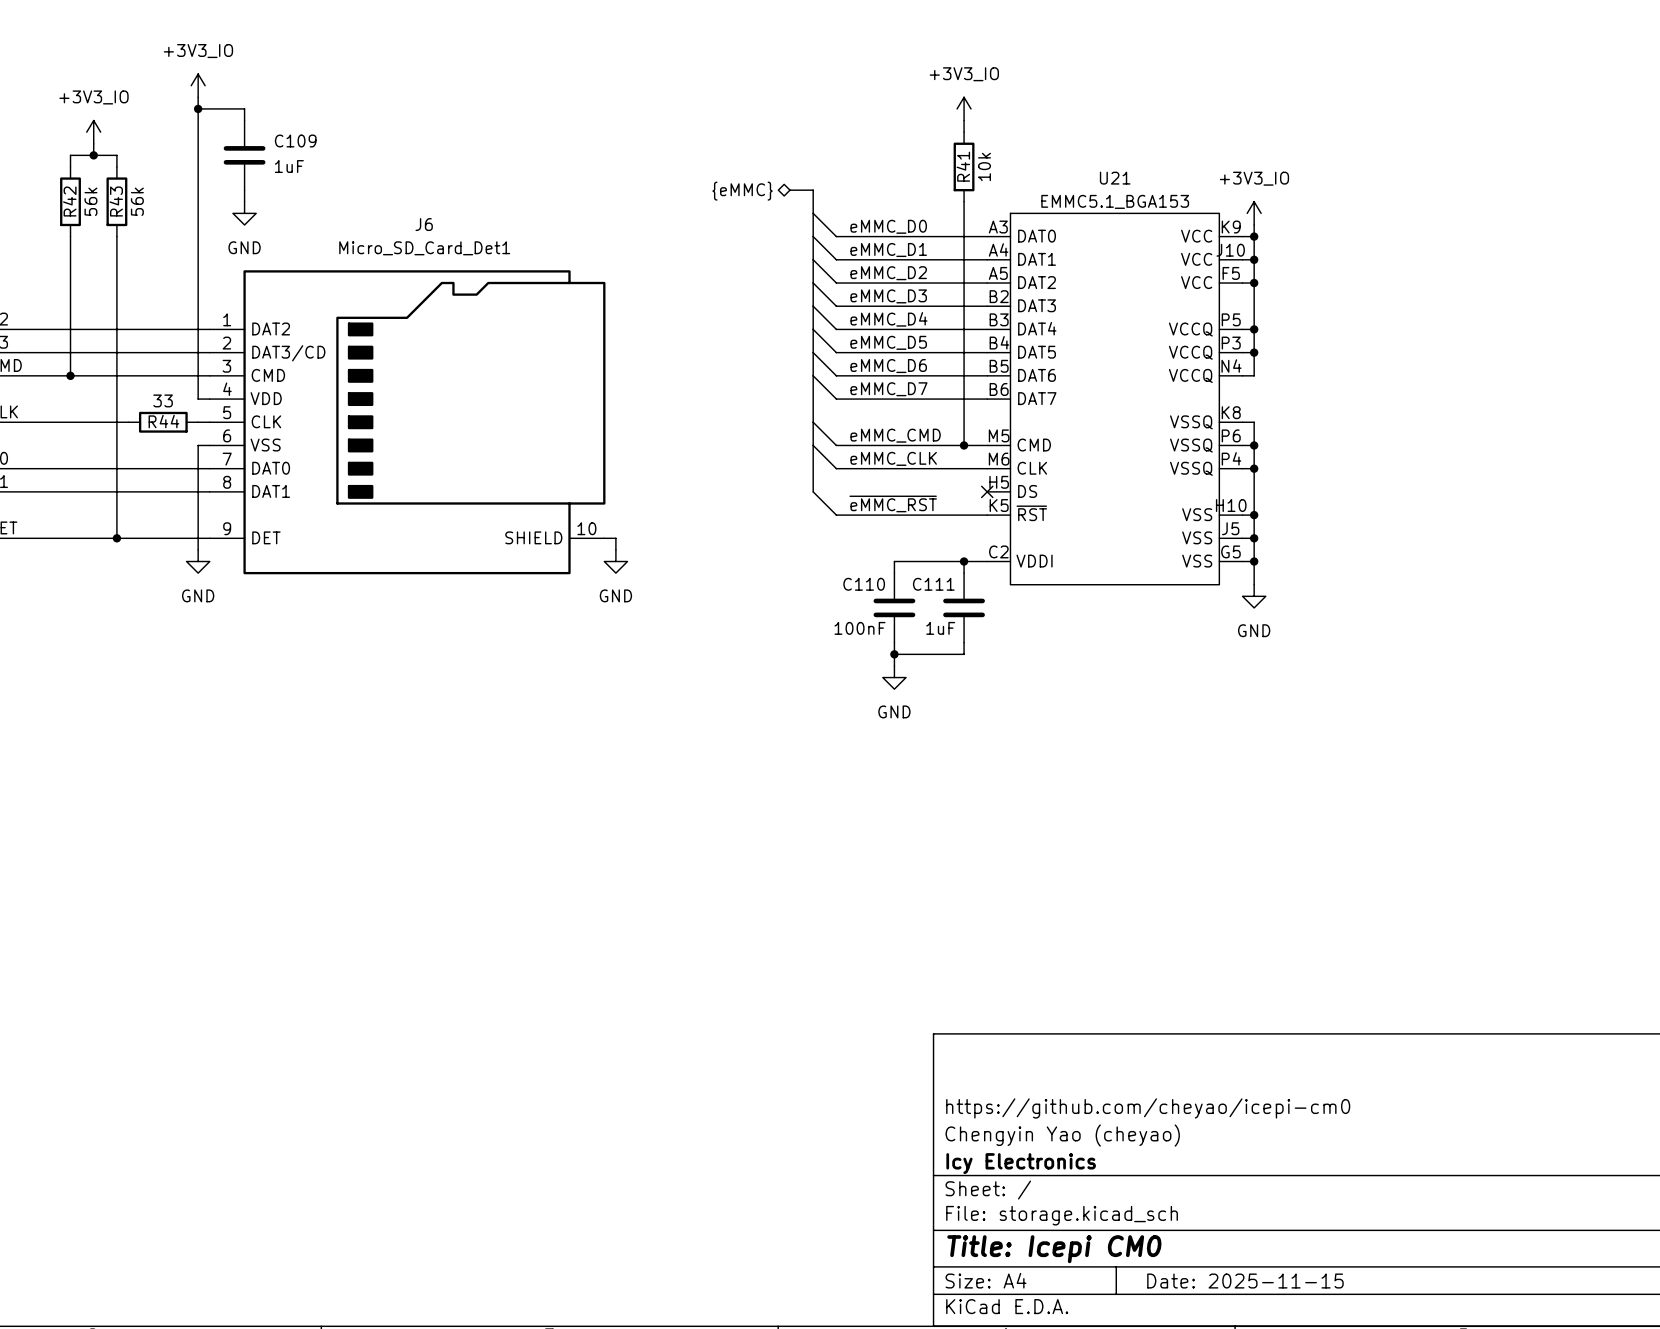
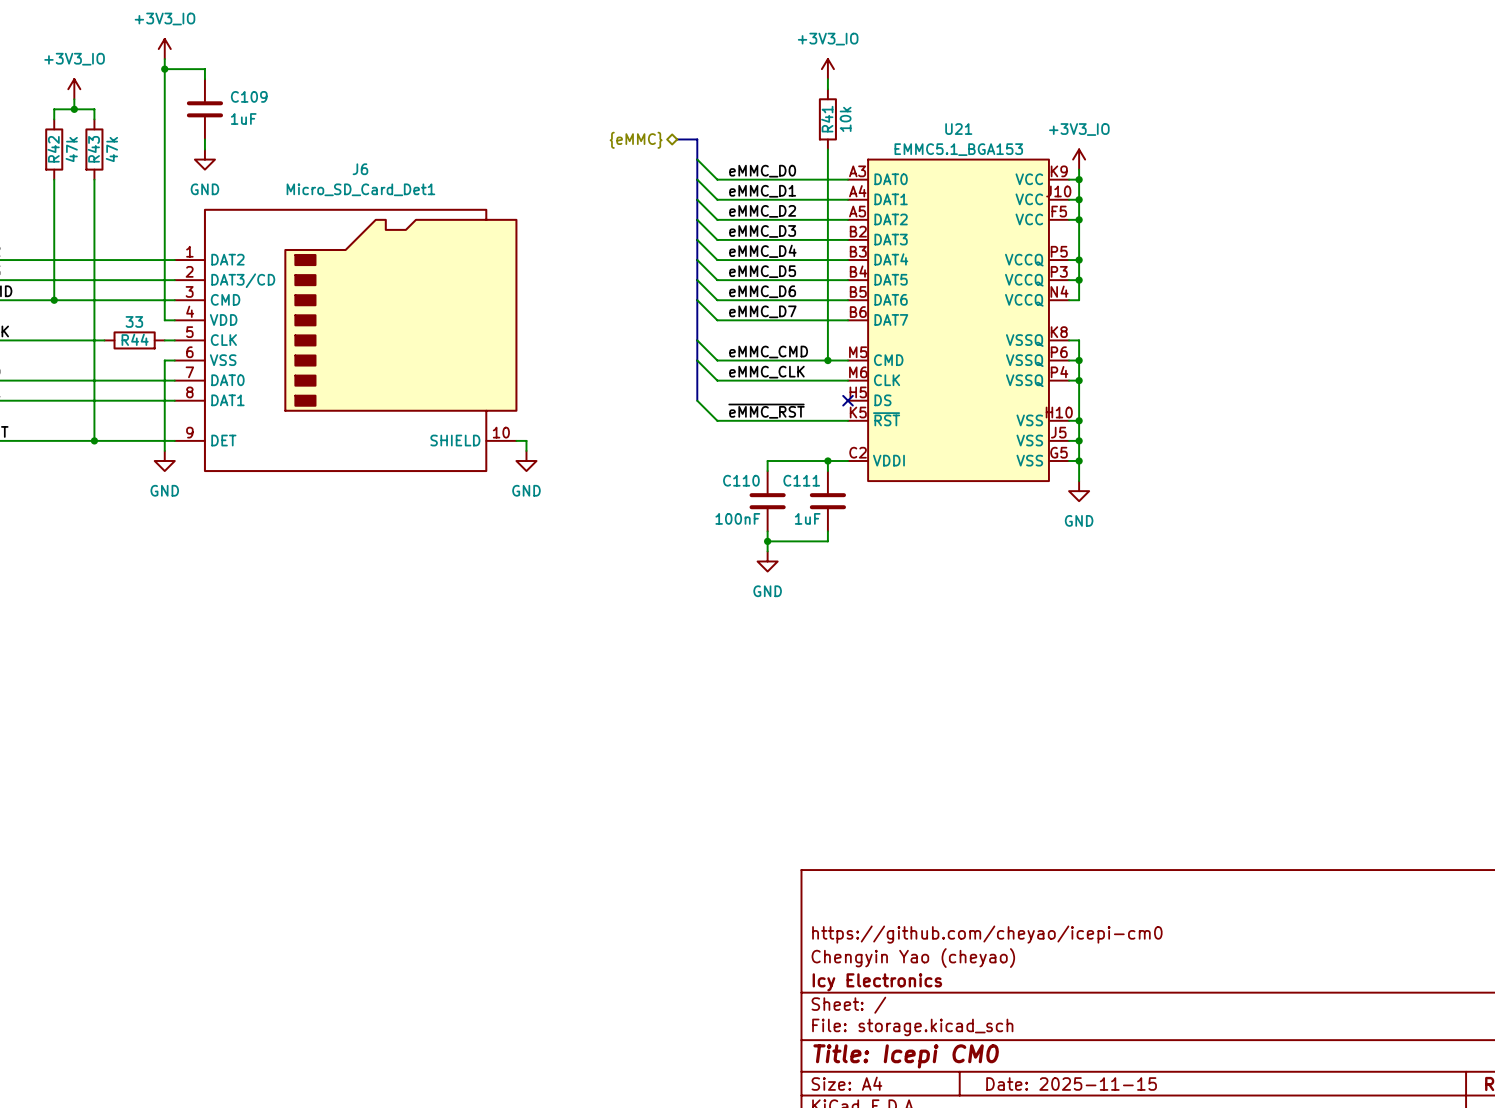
R42 value: 56k (90, 201) -> 47k (71, 149)
R43 value: 56k (137, 201) -> 47k (111, 149)

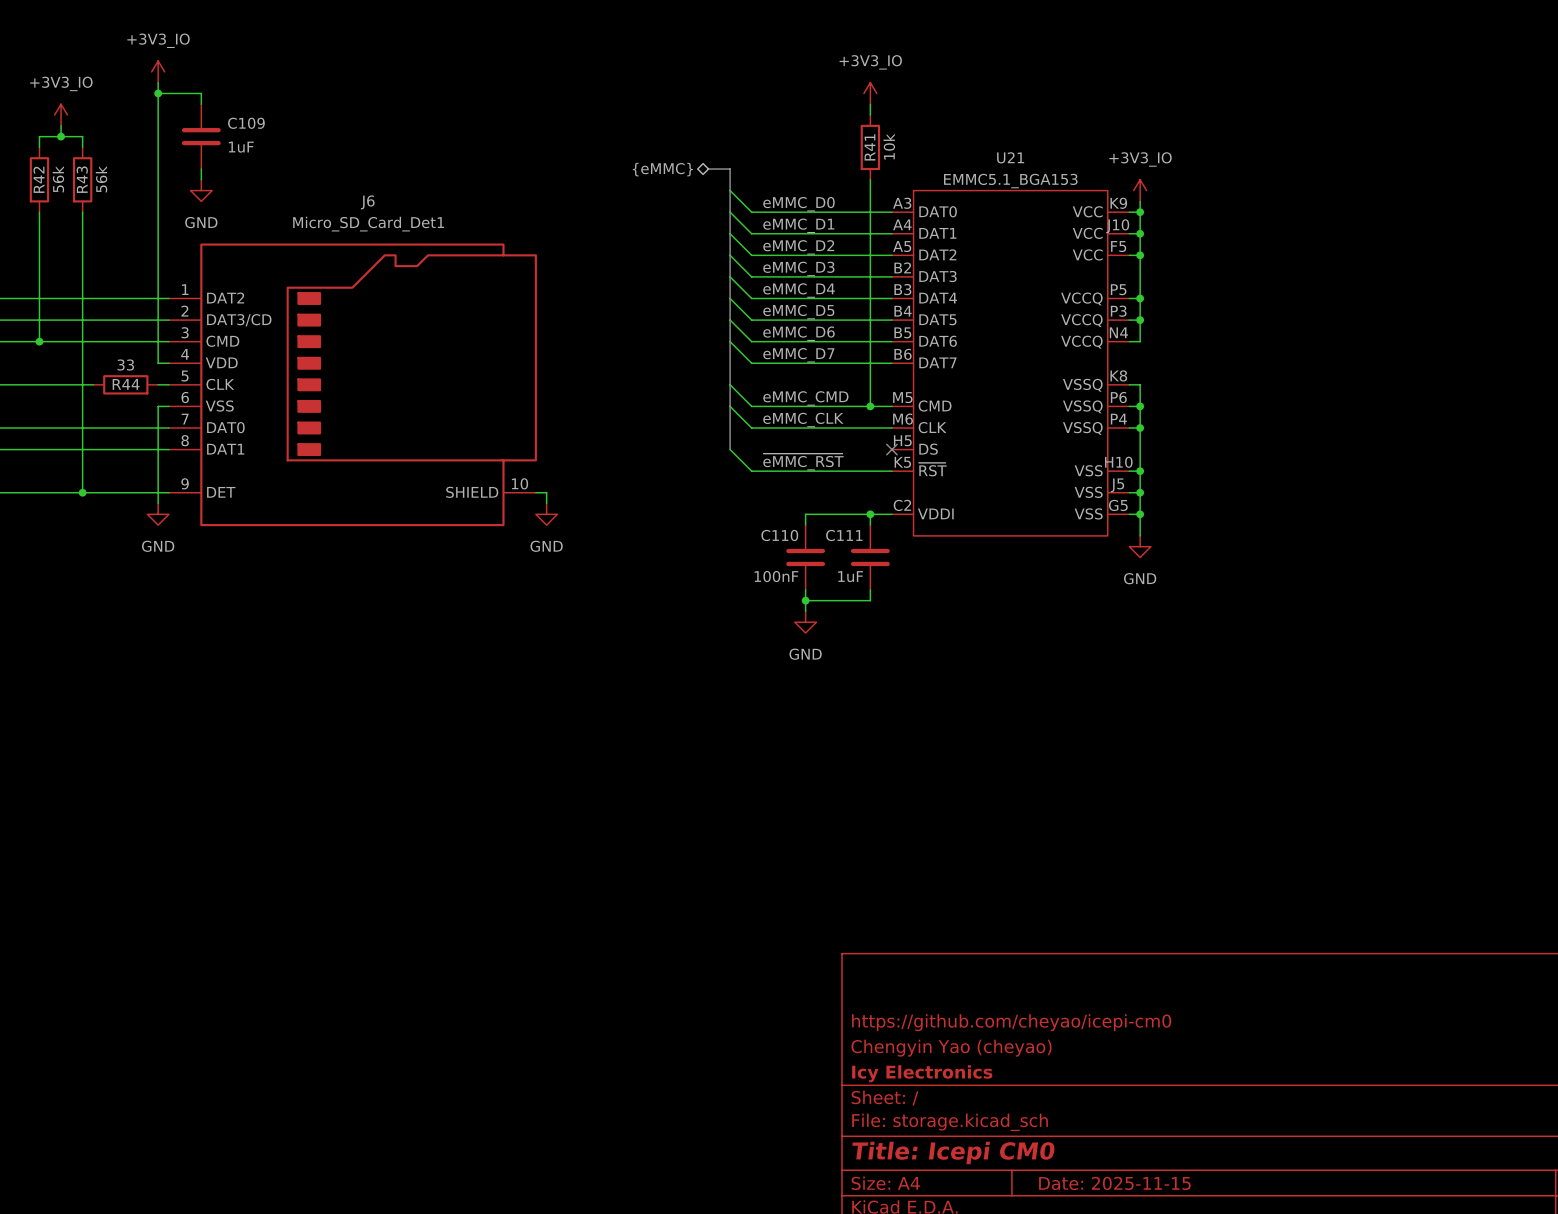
R42 value: 47k (71, 149) -> 56k (58, 179)
R43 value: 47k (111, 149) -> 56k (101, 179)

